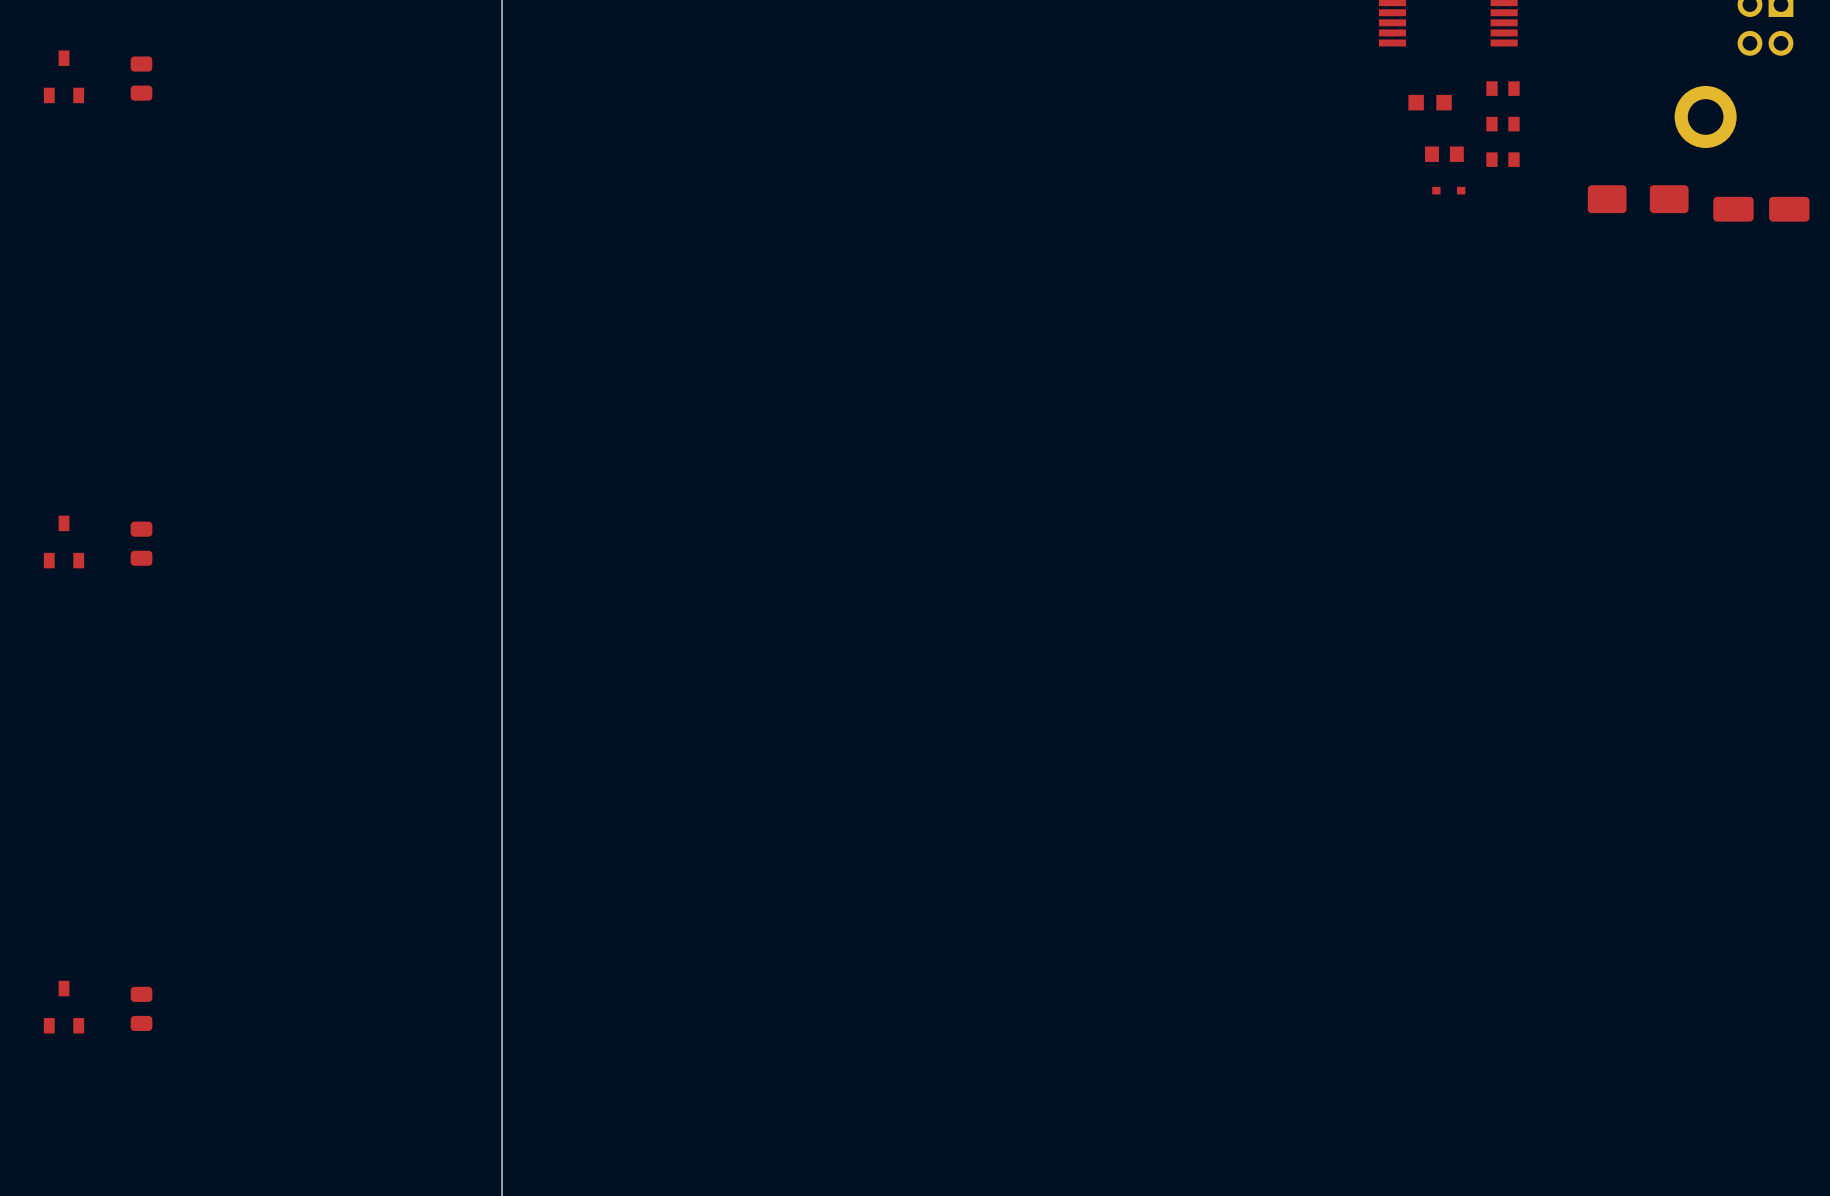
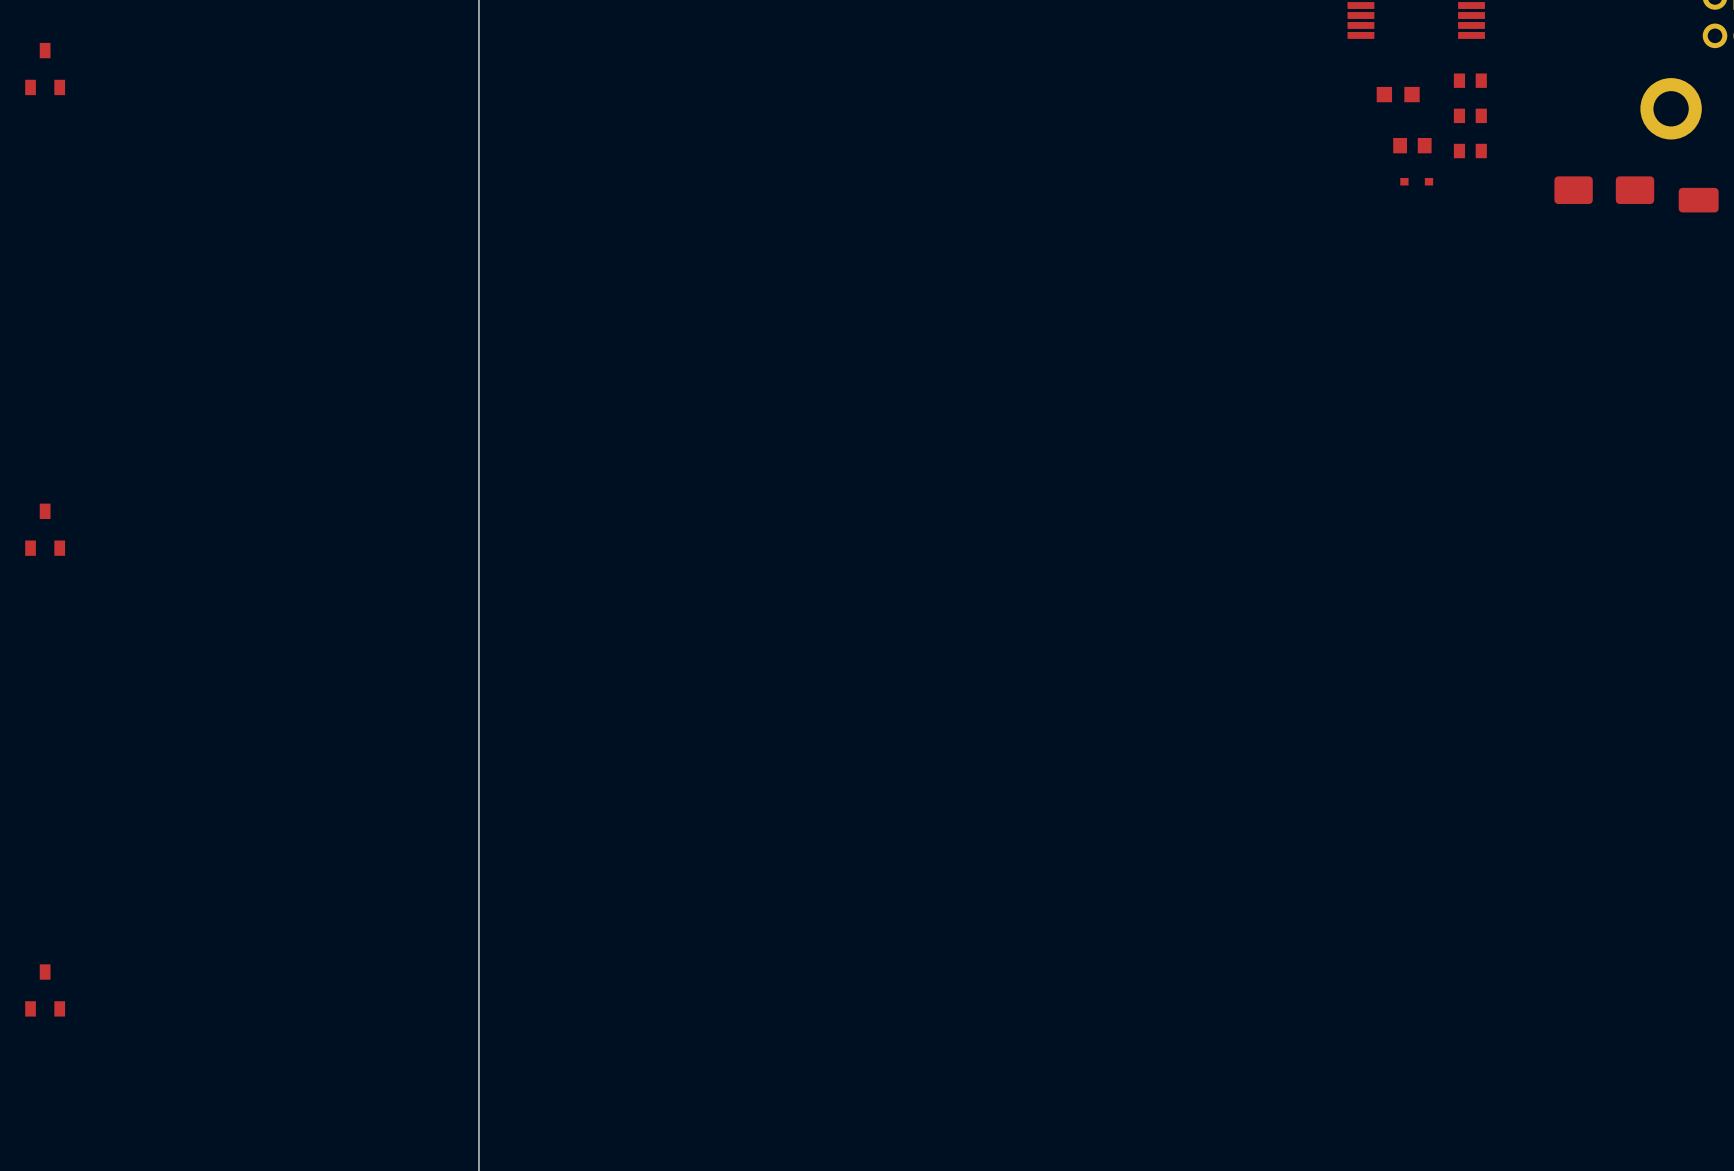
part: (141, 78) -> none
part: (141, 543) -> none
part: (141, 1008) -> none

